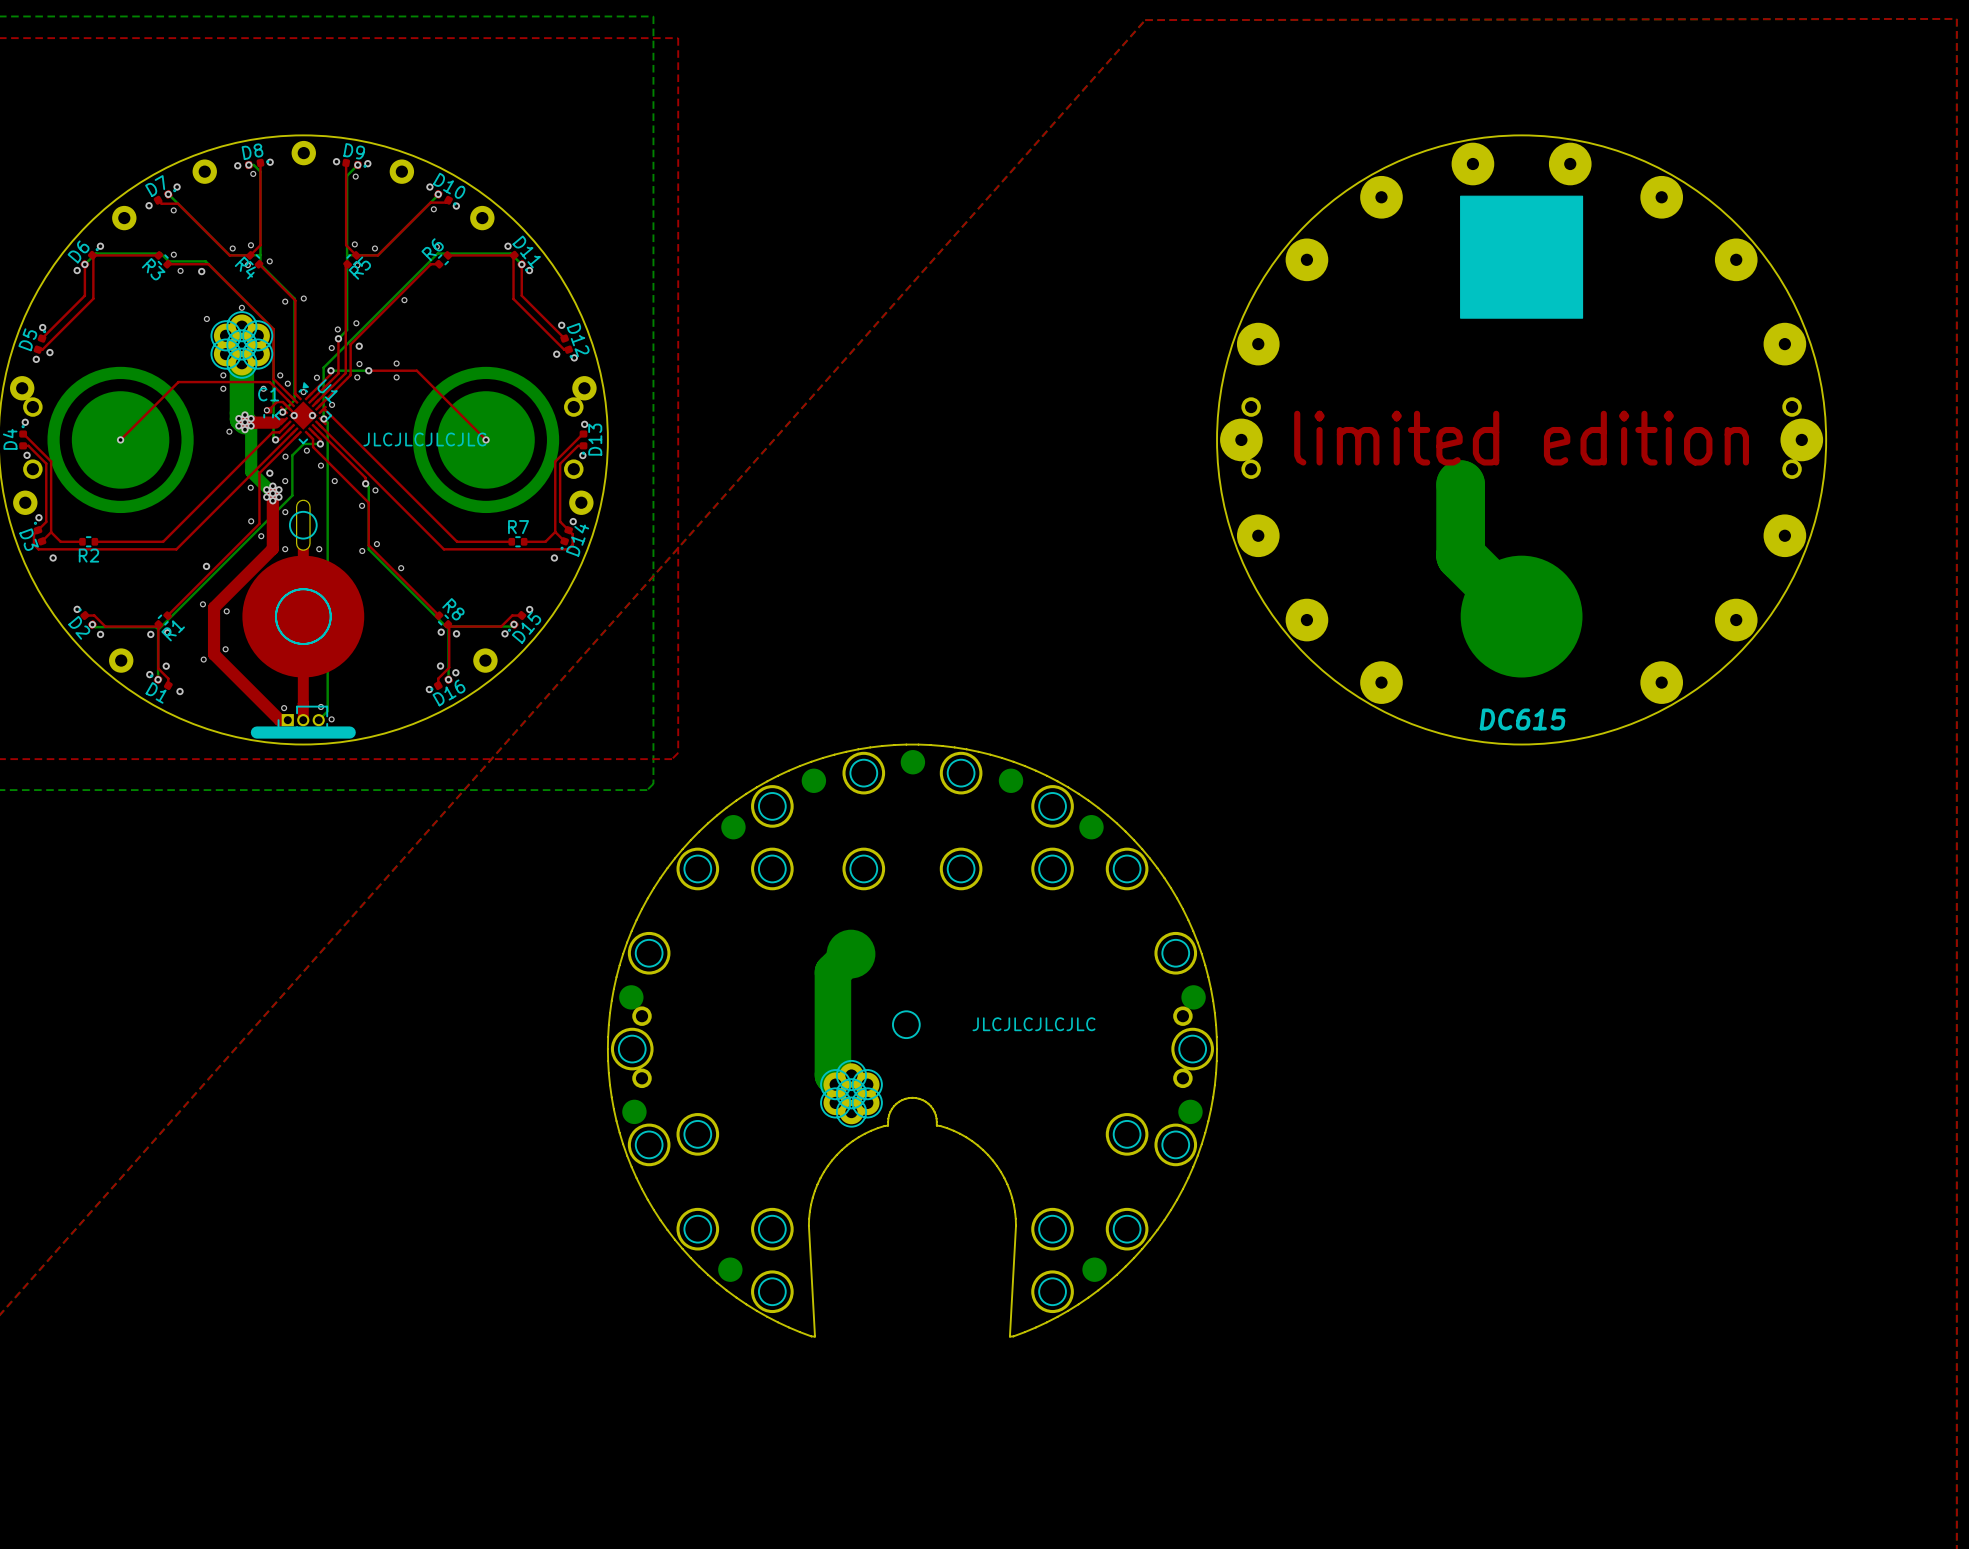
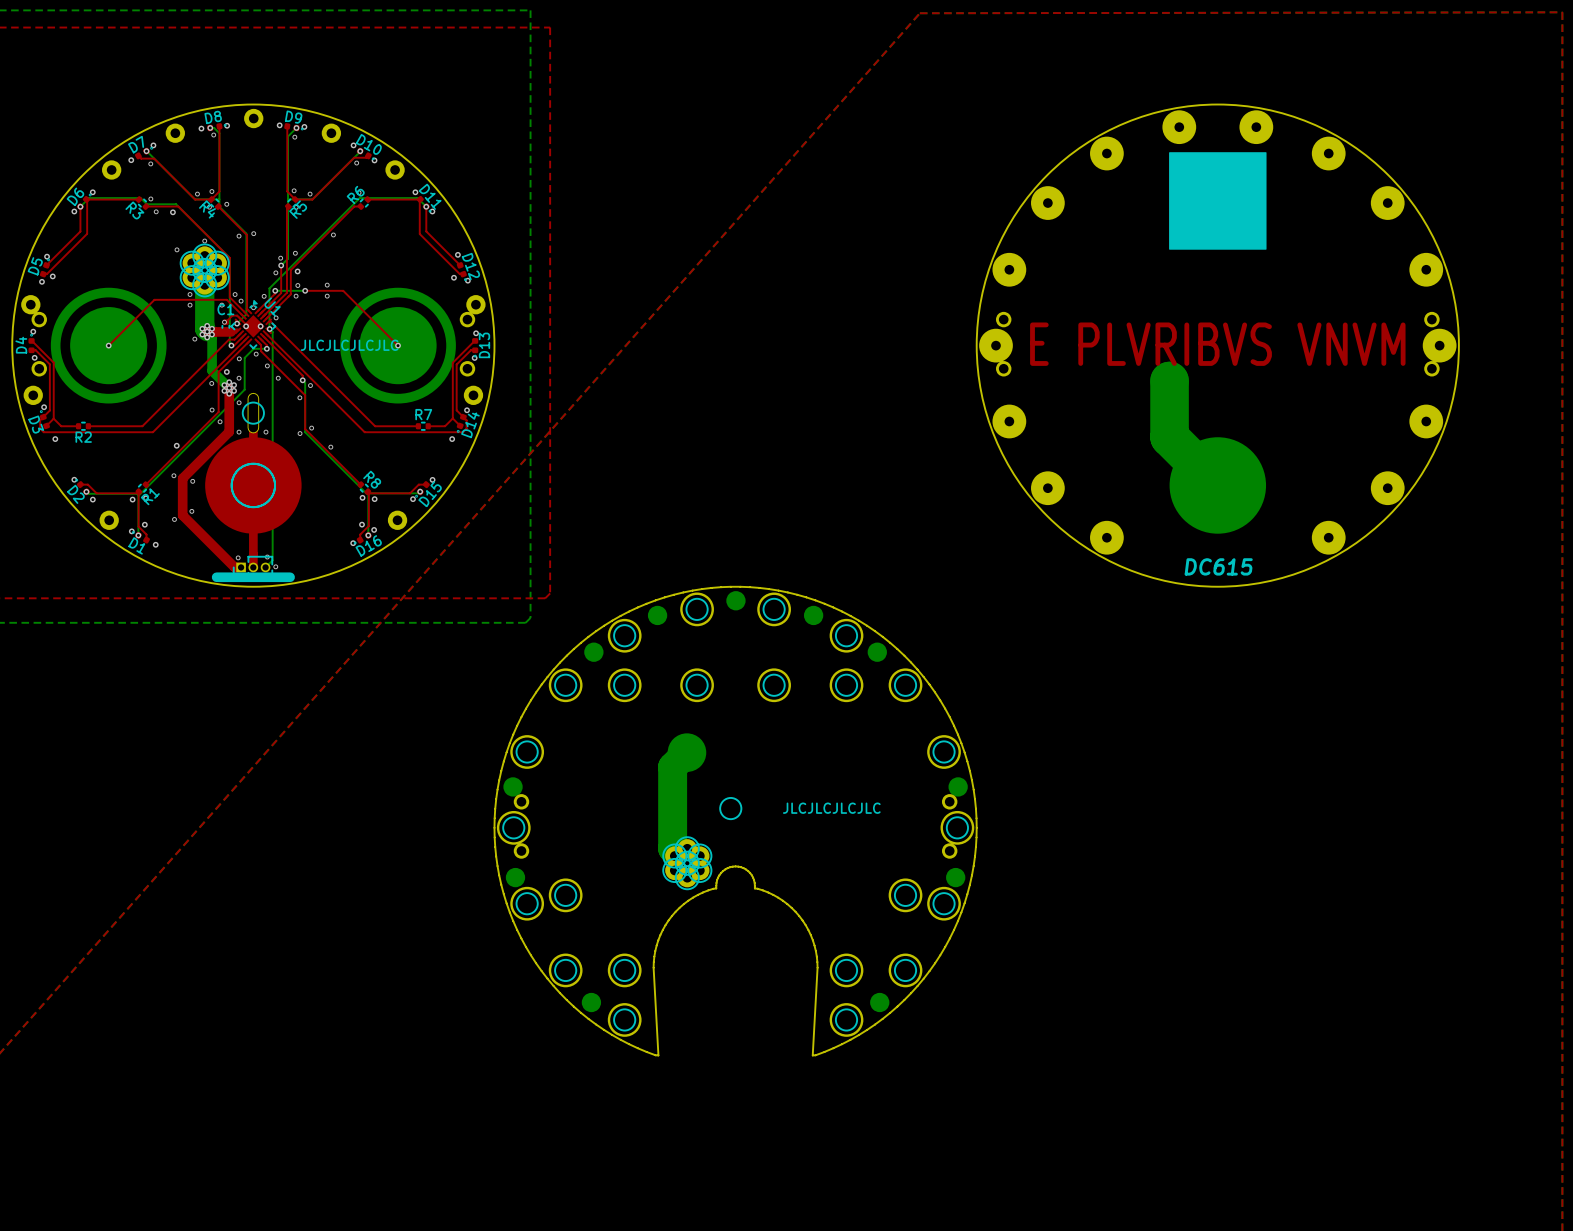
text: limited edition (1521, 438) -> E PLVRIBVS VNVM (1217, 344)

